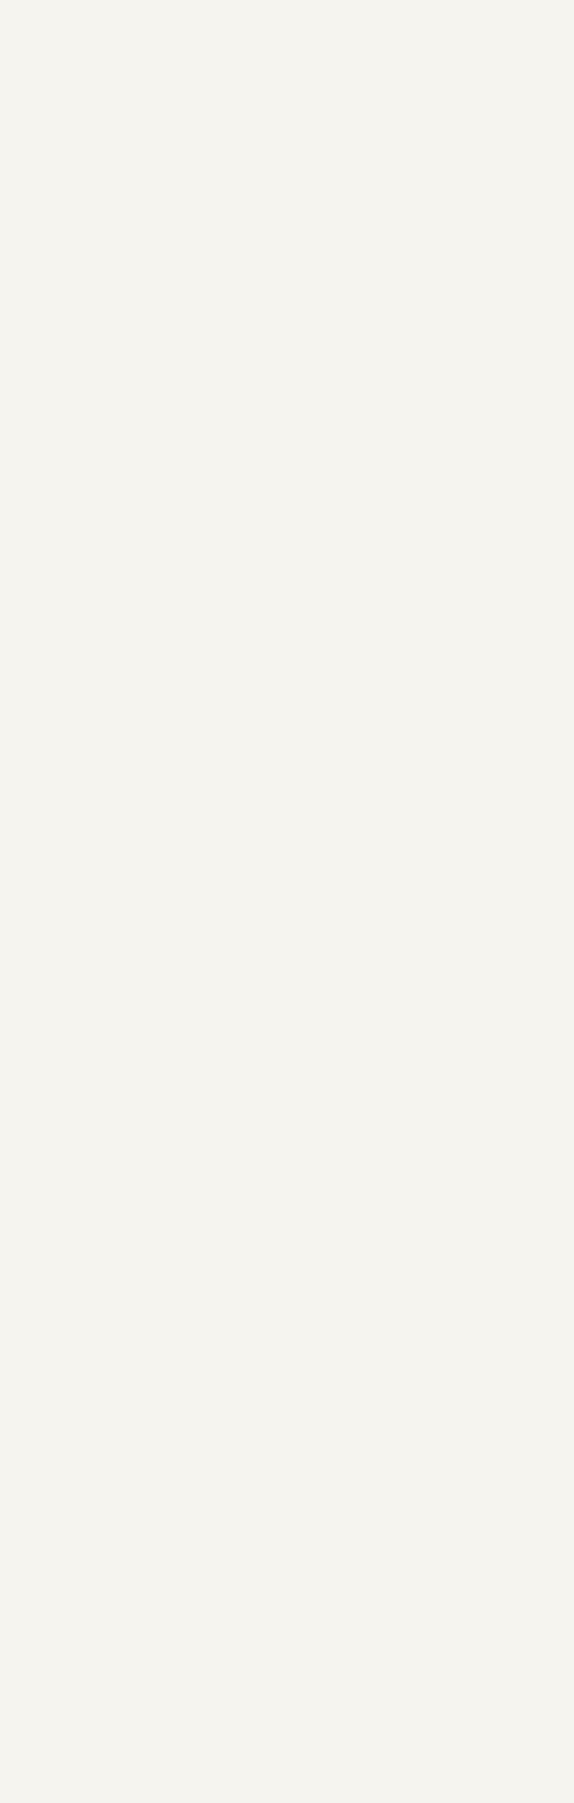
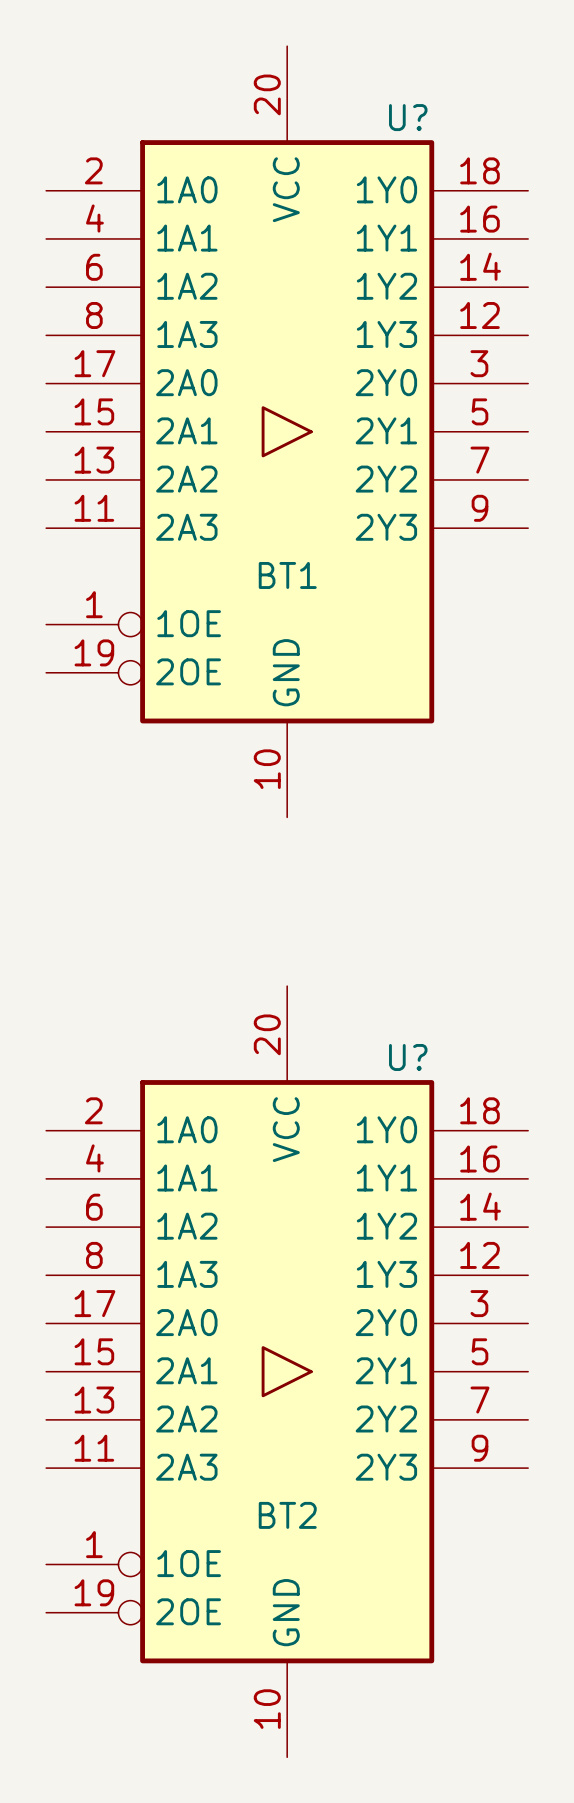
U?: none -> BT1 (287, 431)
U?: none -> BT2 (287, 1371)

